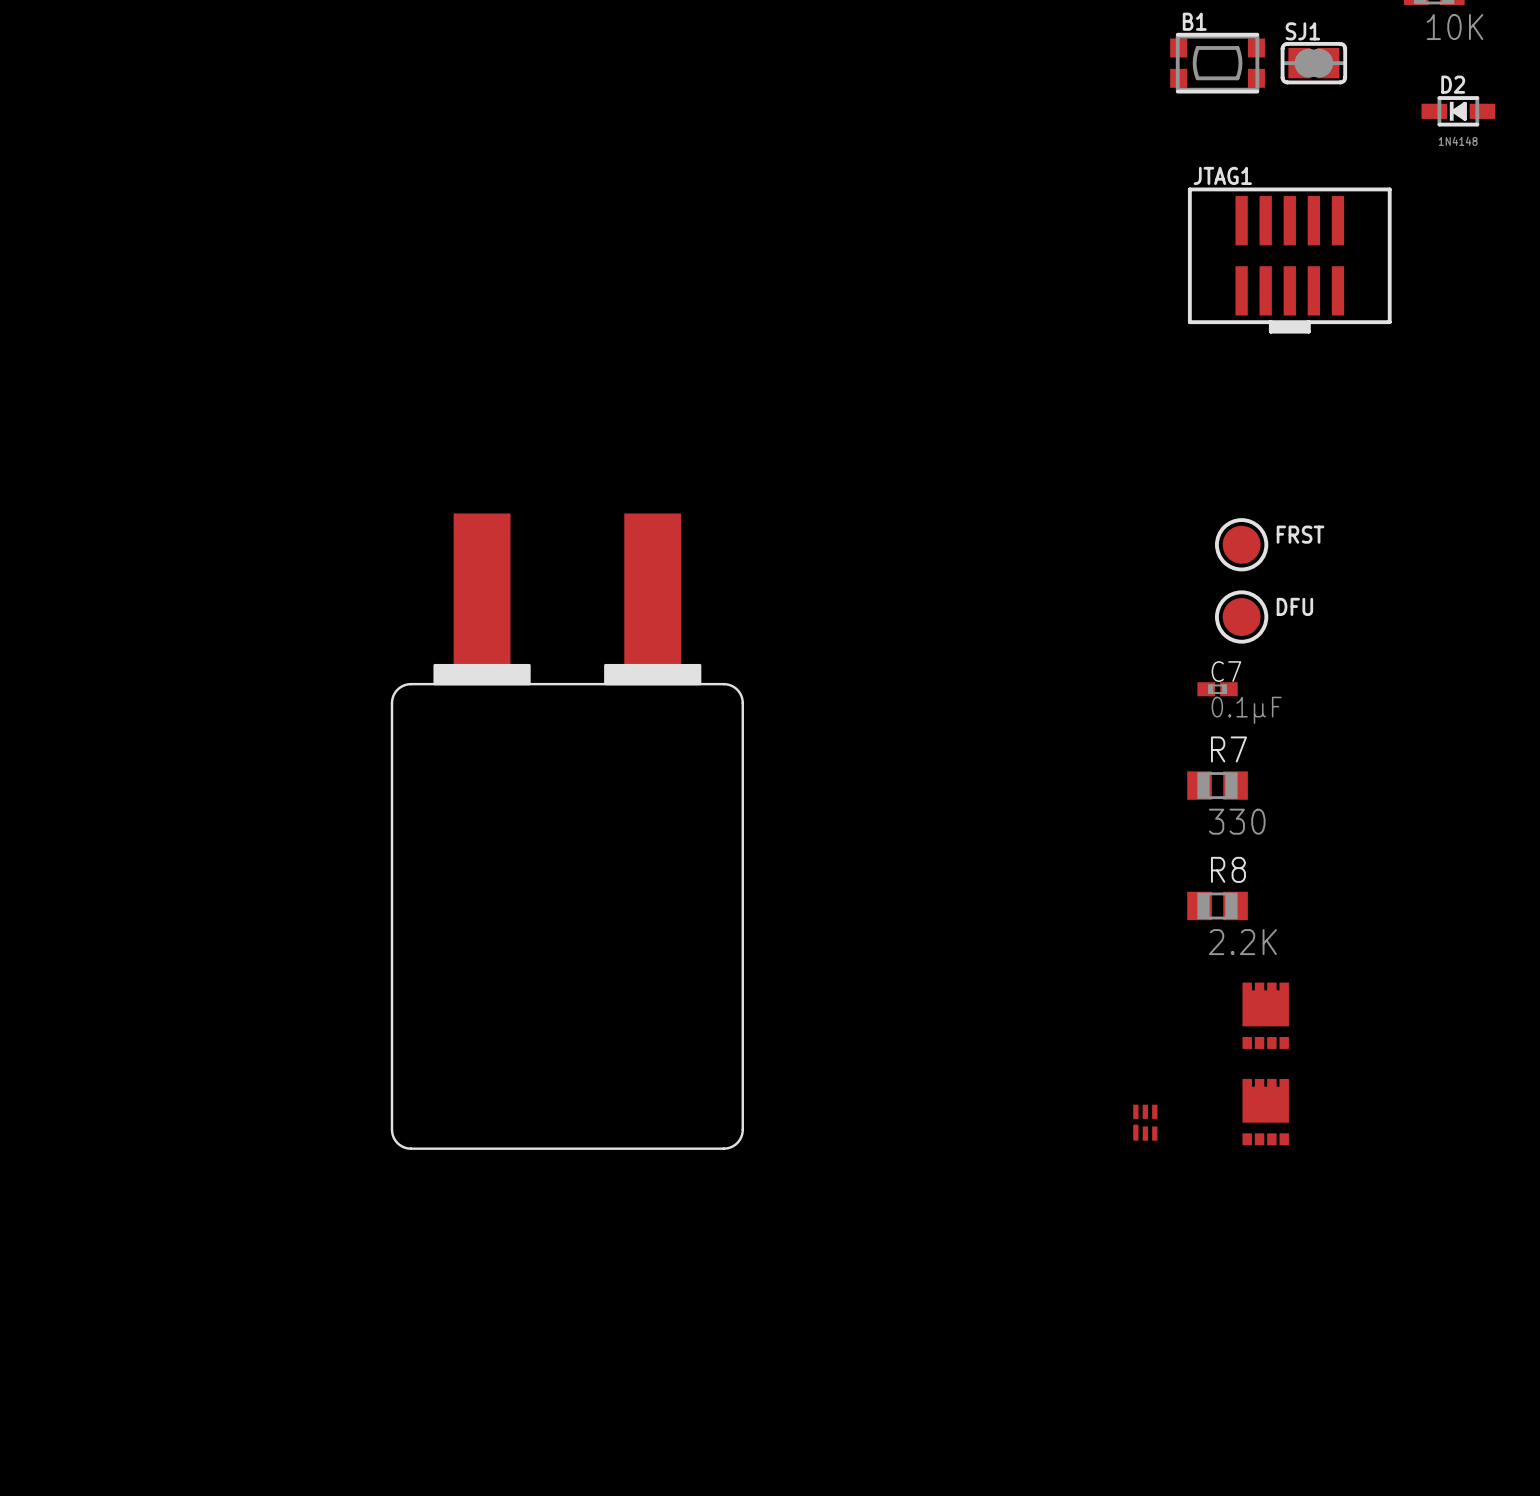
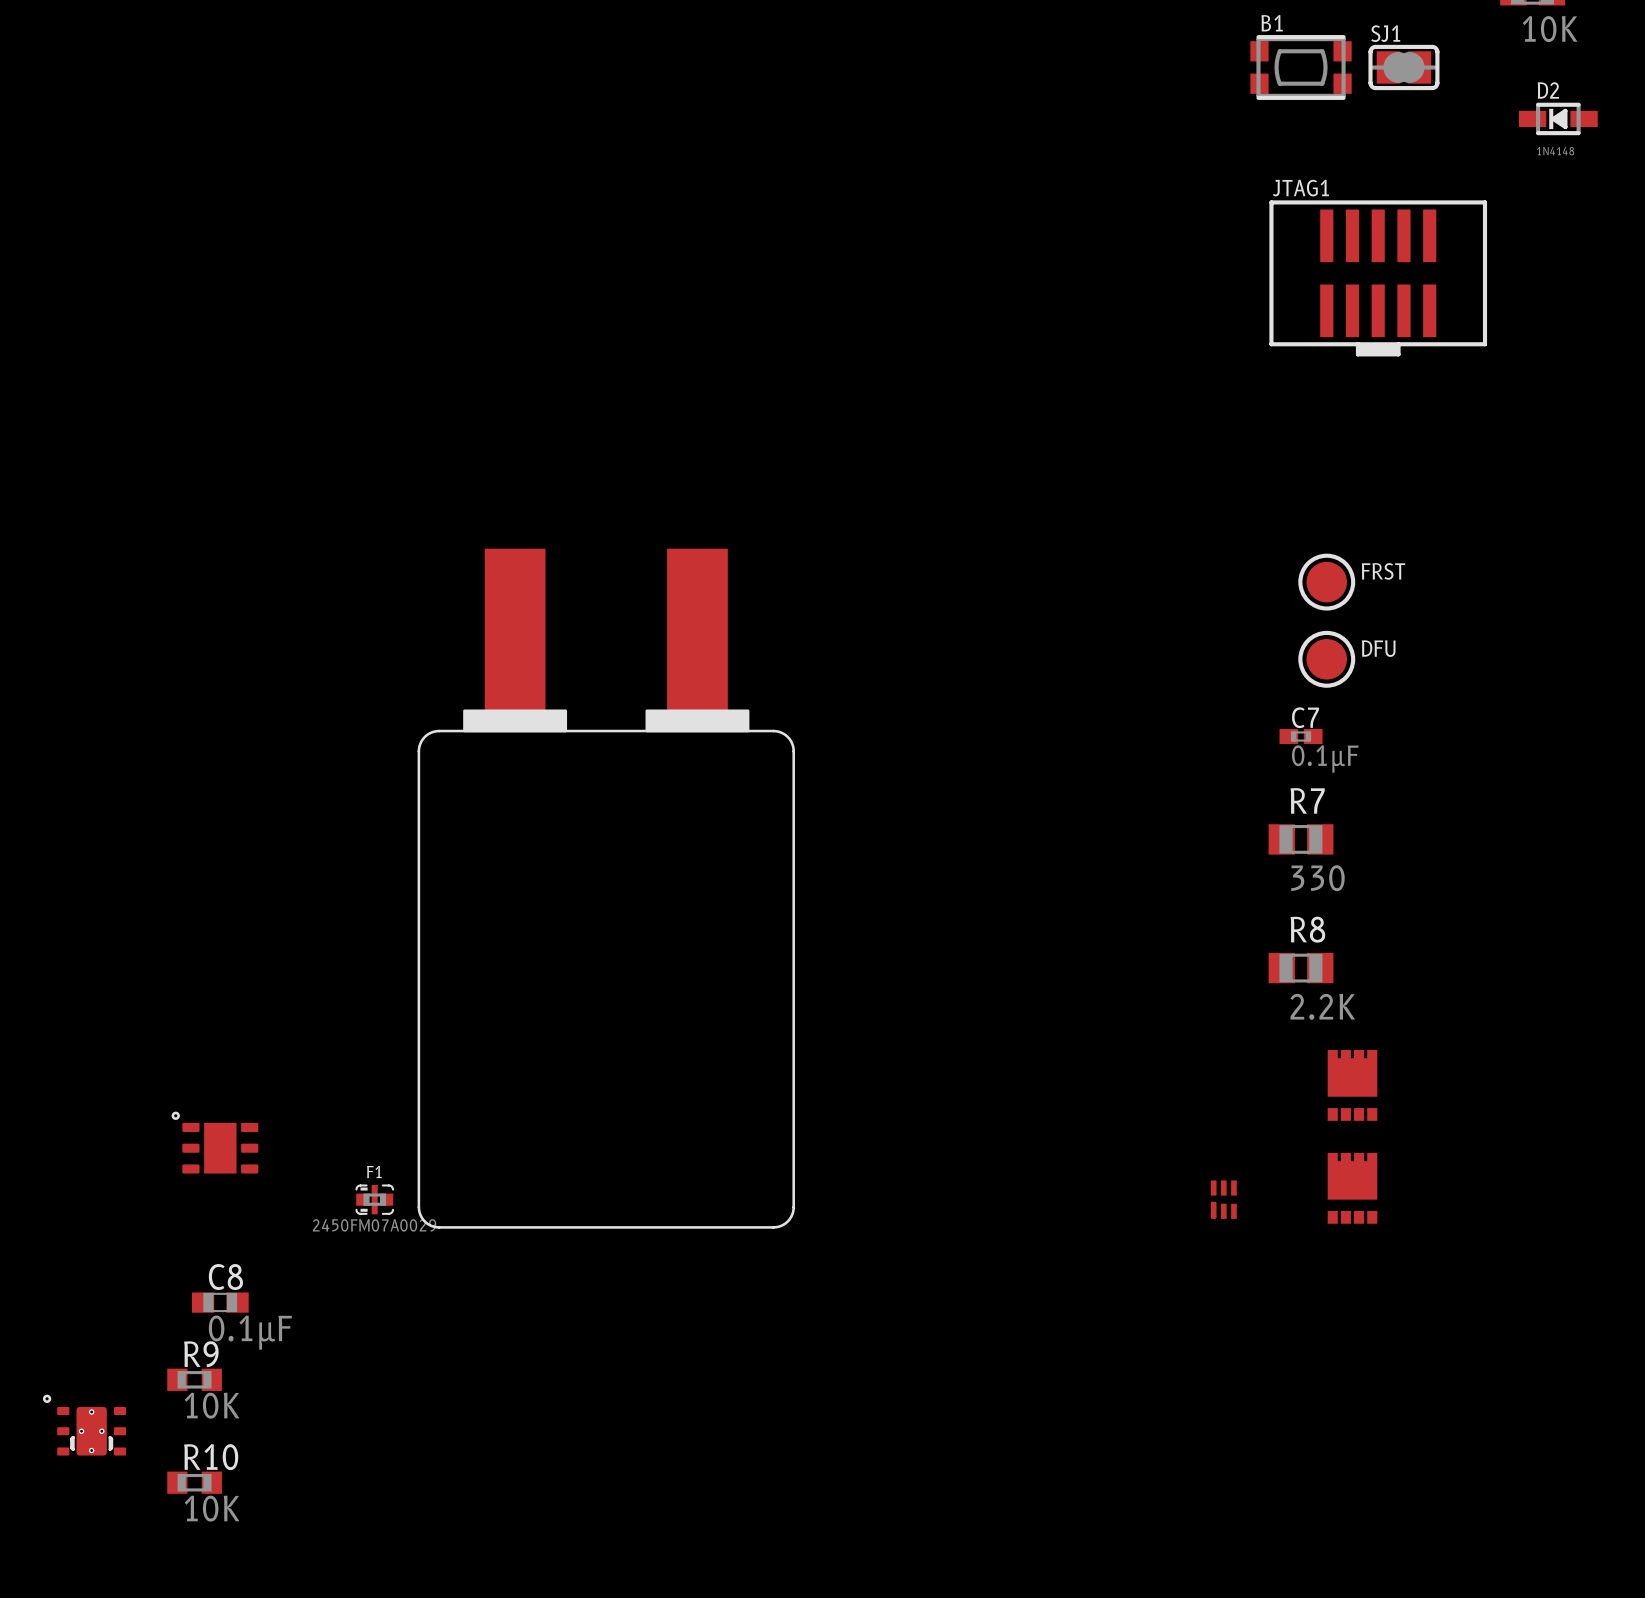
part: none -> (214, 1142)
F1: none -> 2450FM07A0029 (374, 1199)
C8: none -> 0.1µF (220, 1302)
R9: none -> 10K (194, 1379)
part: none -> (84, 1425)
R10: none -> 10K (194, 1482)

